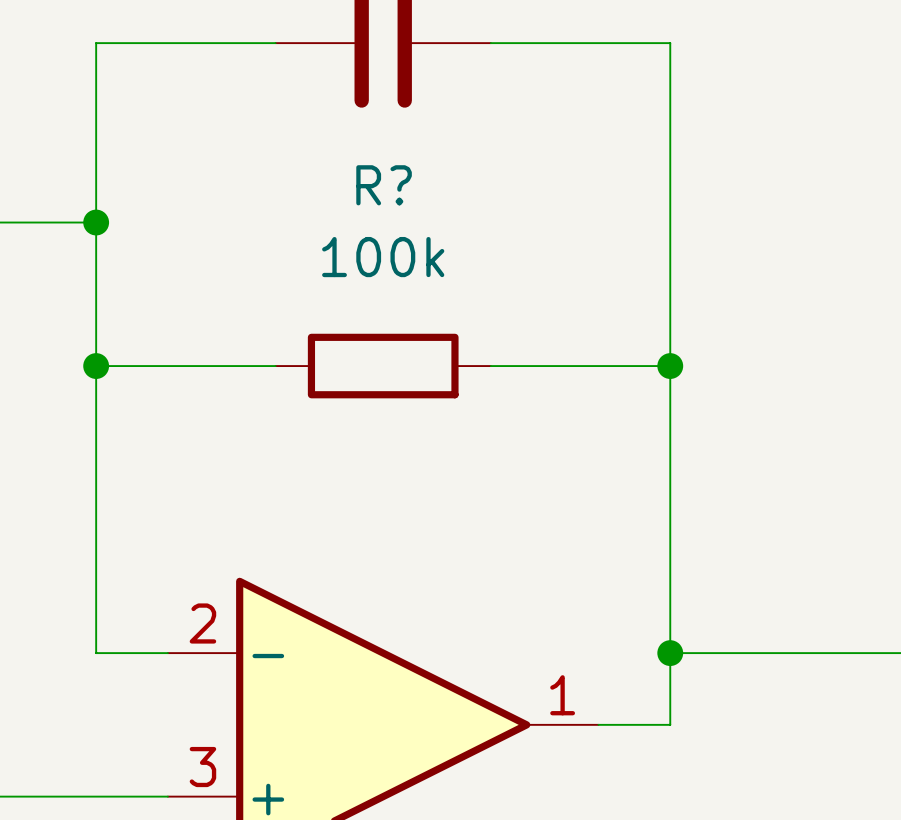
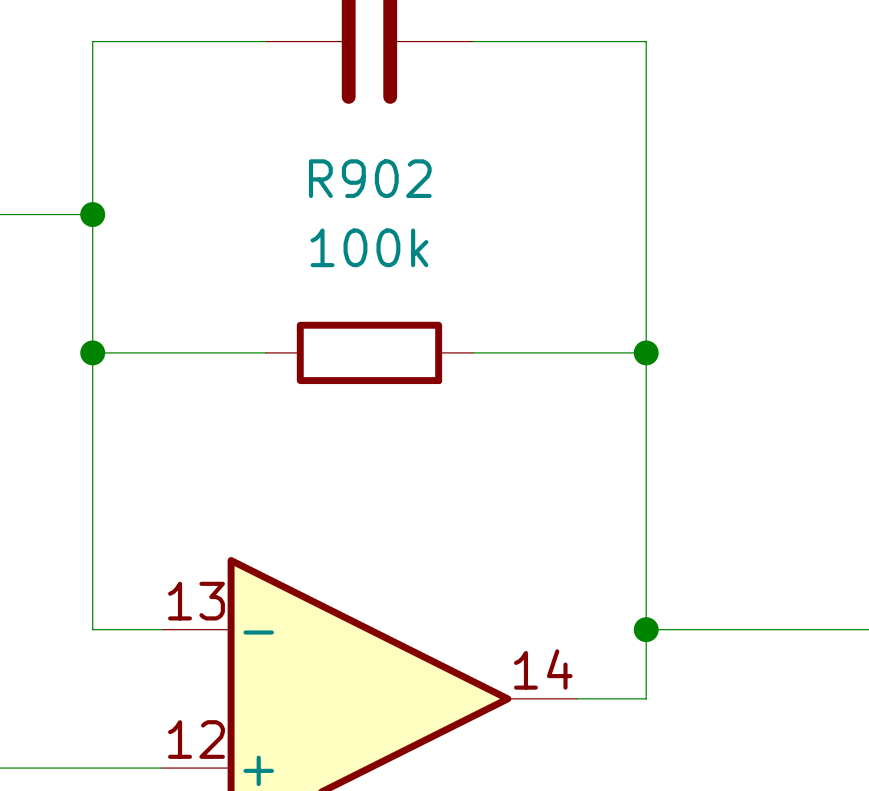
R? name: R? (384, 185) -> R902 (370, 178)
part pin number: 2 (202, 623) -> 13 (196, 601)
part pin number: 1 (562, 695) -> 14 (543, 669)
part pin number: 3 (202, 767) -> 12 (196, 739)

